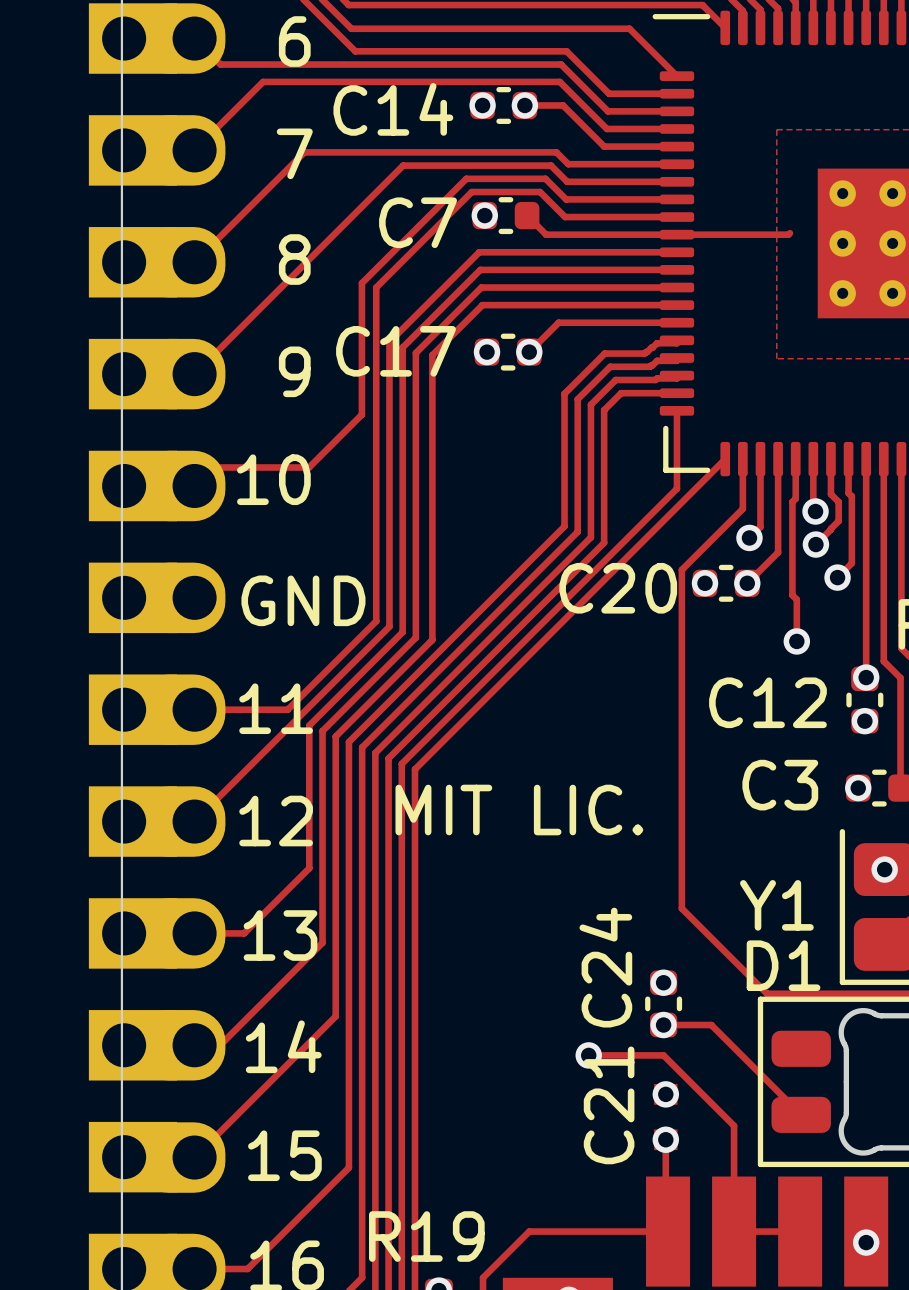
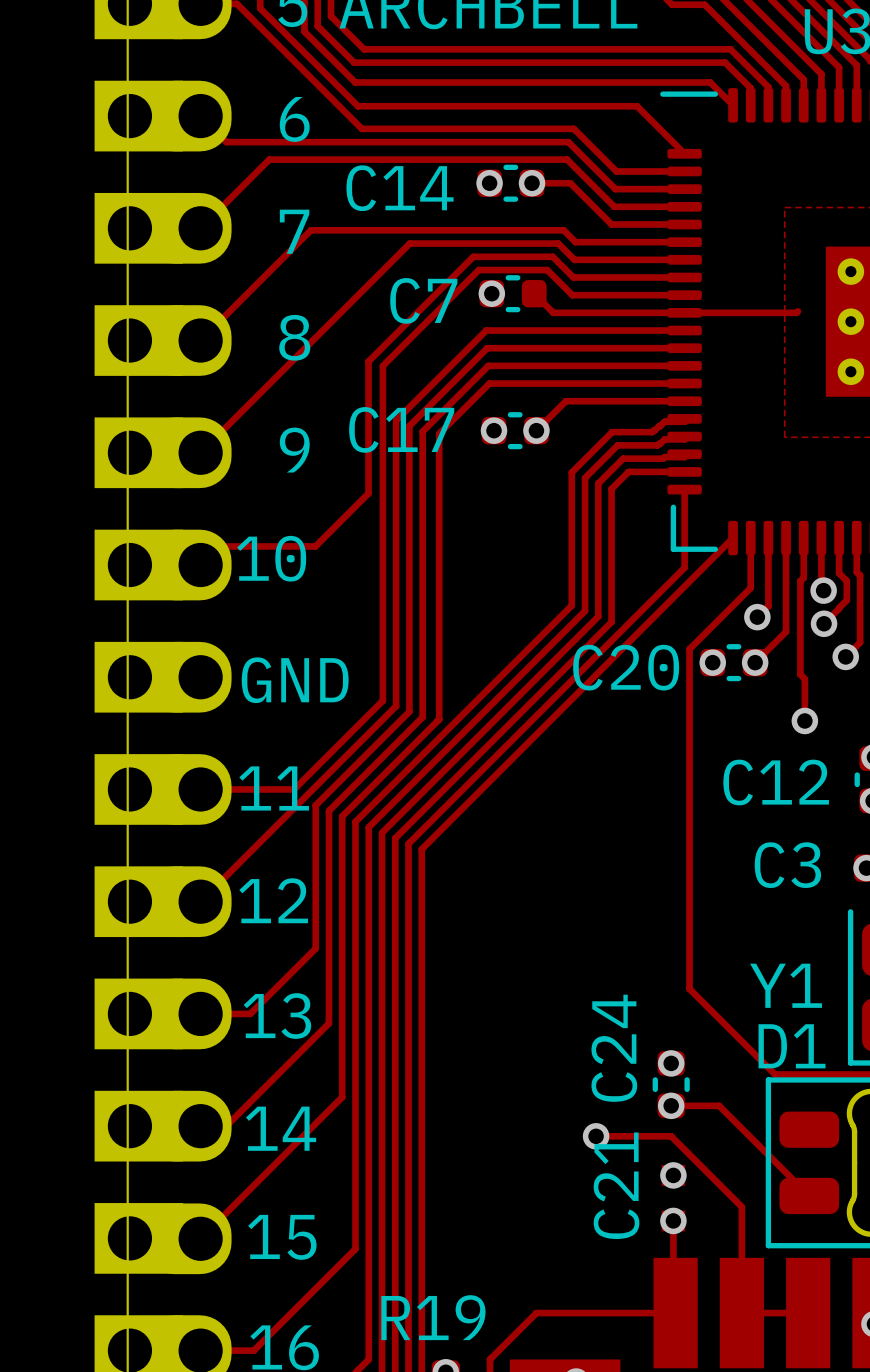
text: MIT LIC. (519, 810) -> none

